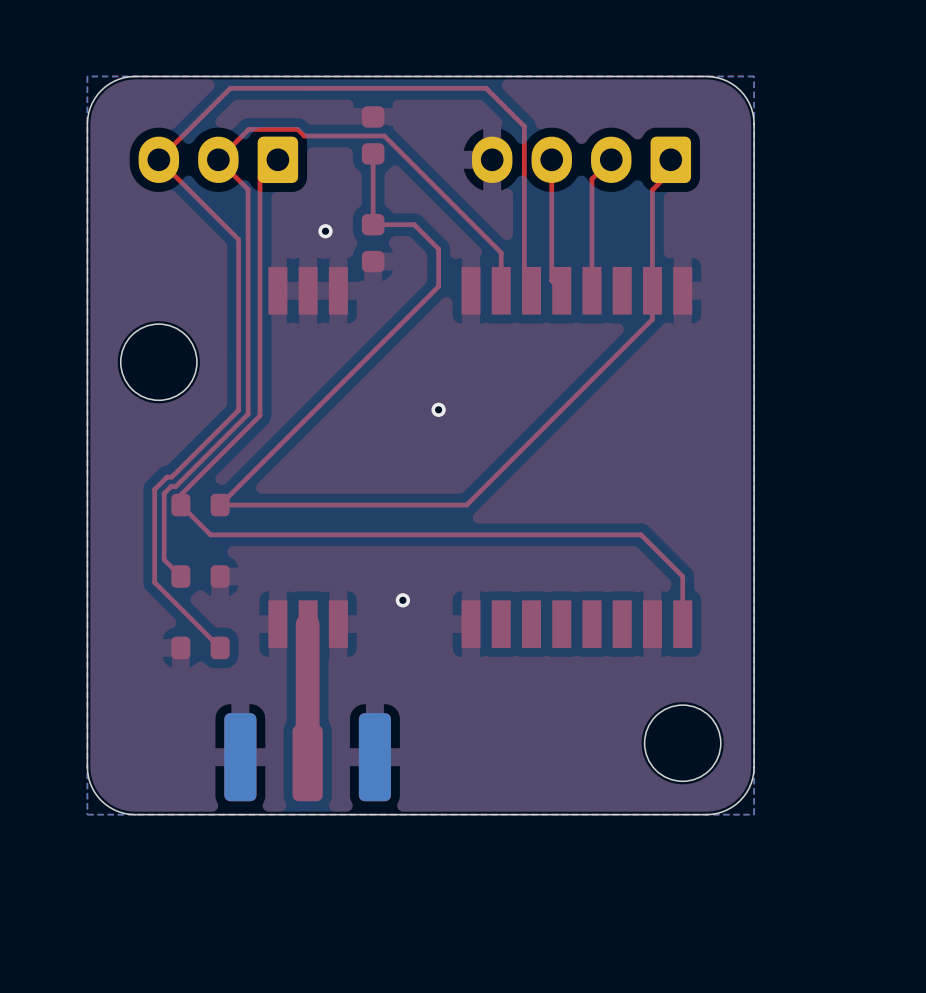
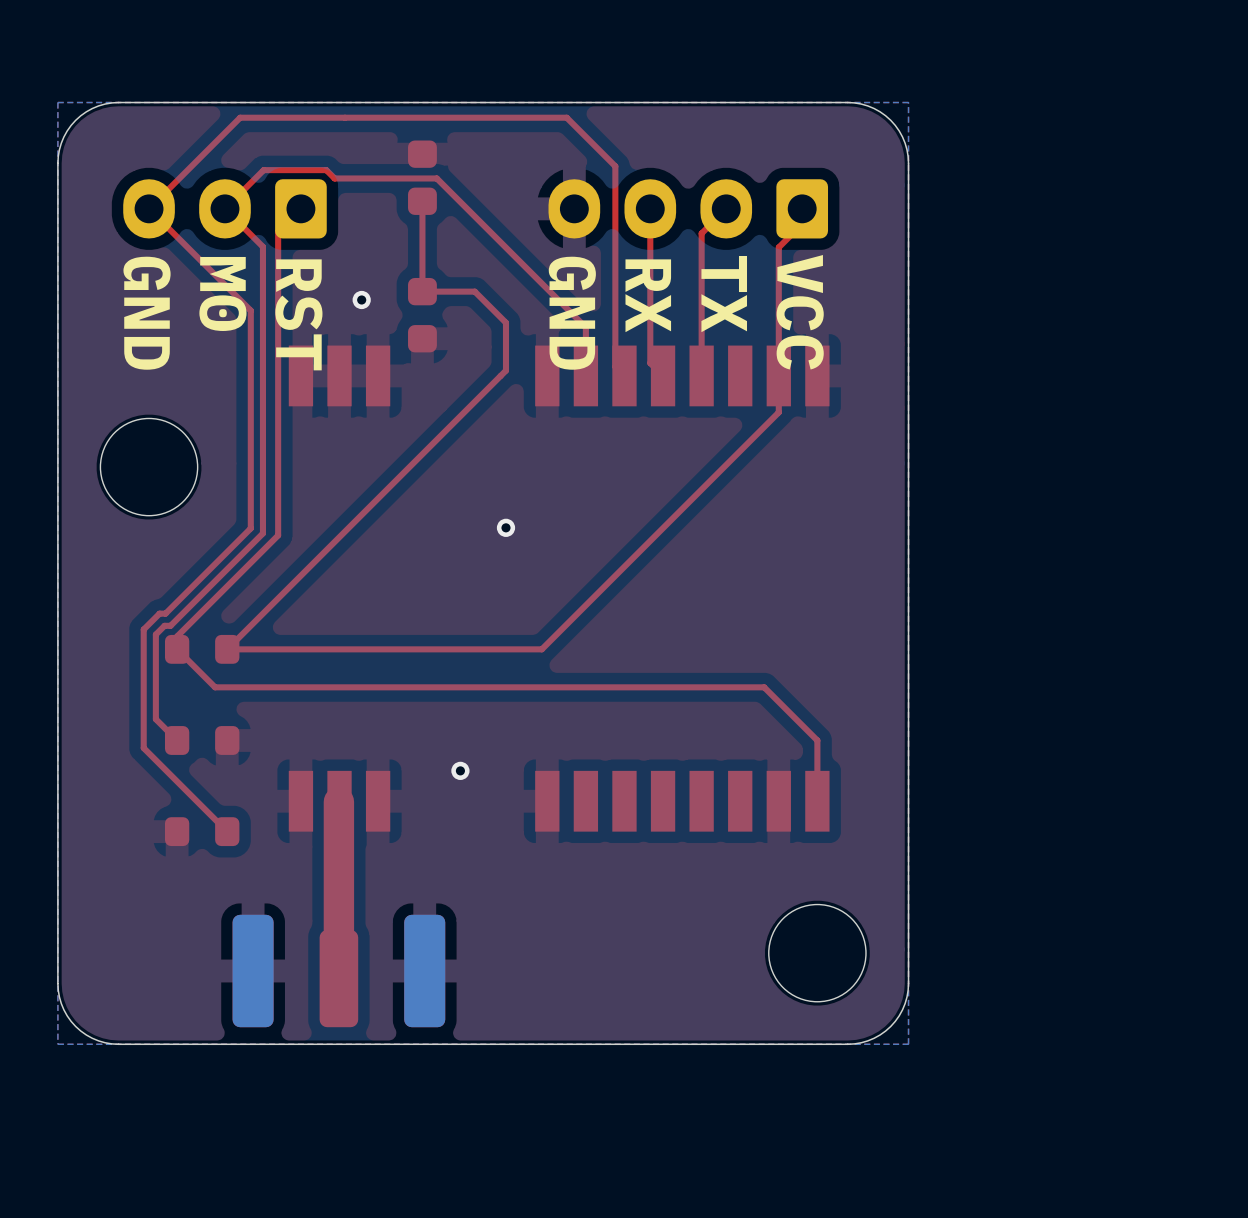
text: none -> TX (724, 294)
text: none -> RX (648, 295)
text: none -> M0 (222, 293)
text: none -> VCC (800, 312)
text: none -> RST (298, 314)
text: none -> GND (147, 313)
text: none -> GND (572, 313)

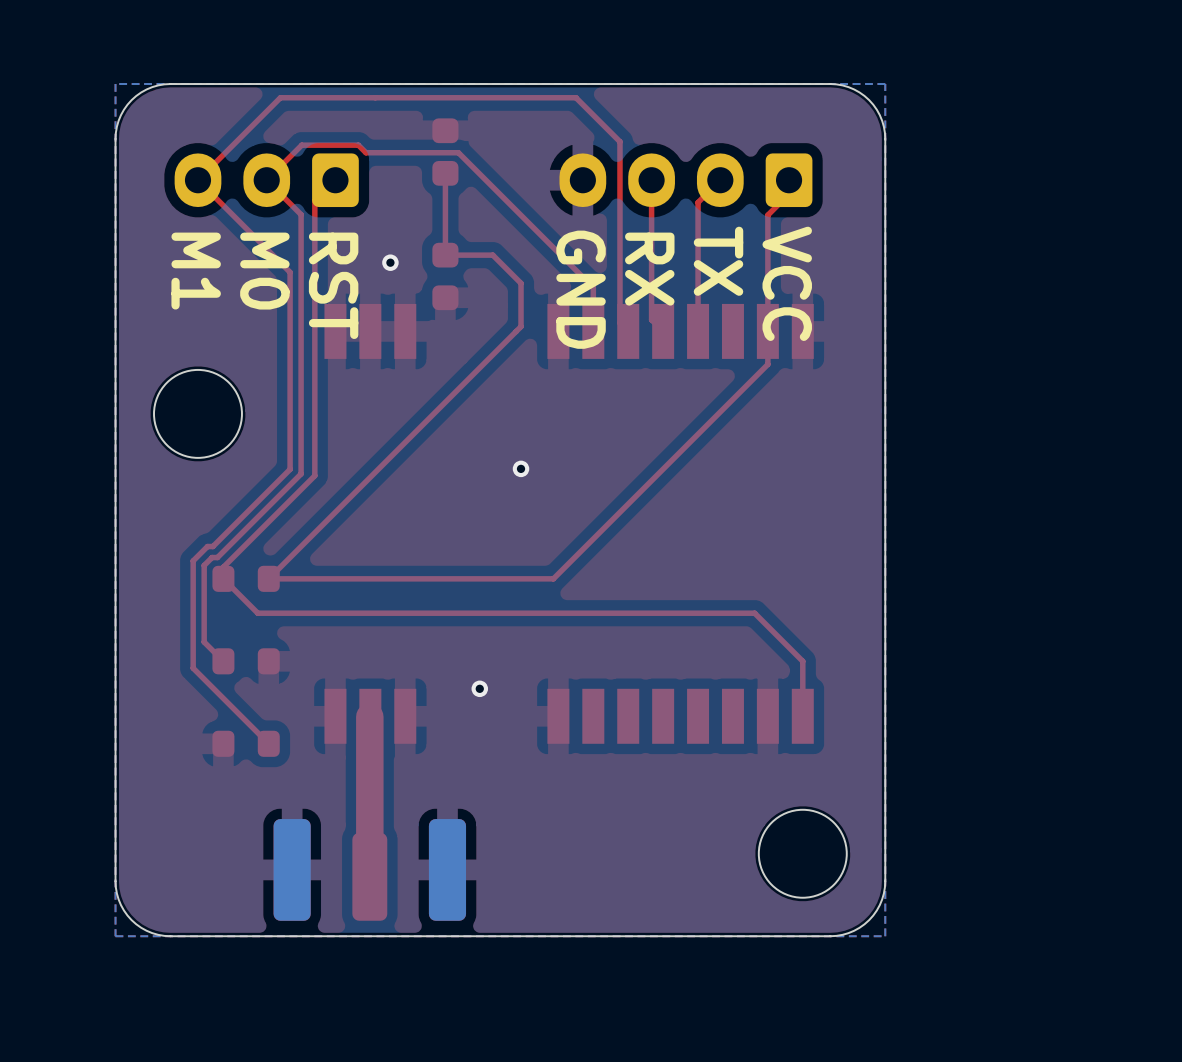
text: GND (147, 313) -> M1 (196, 271)

